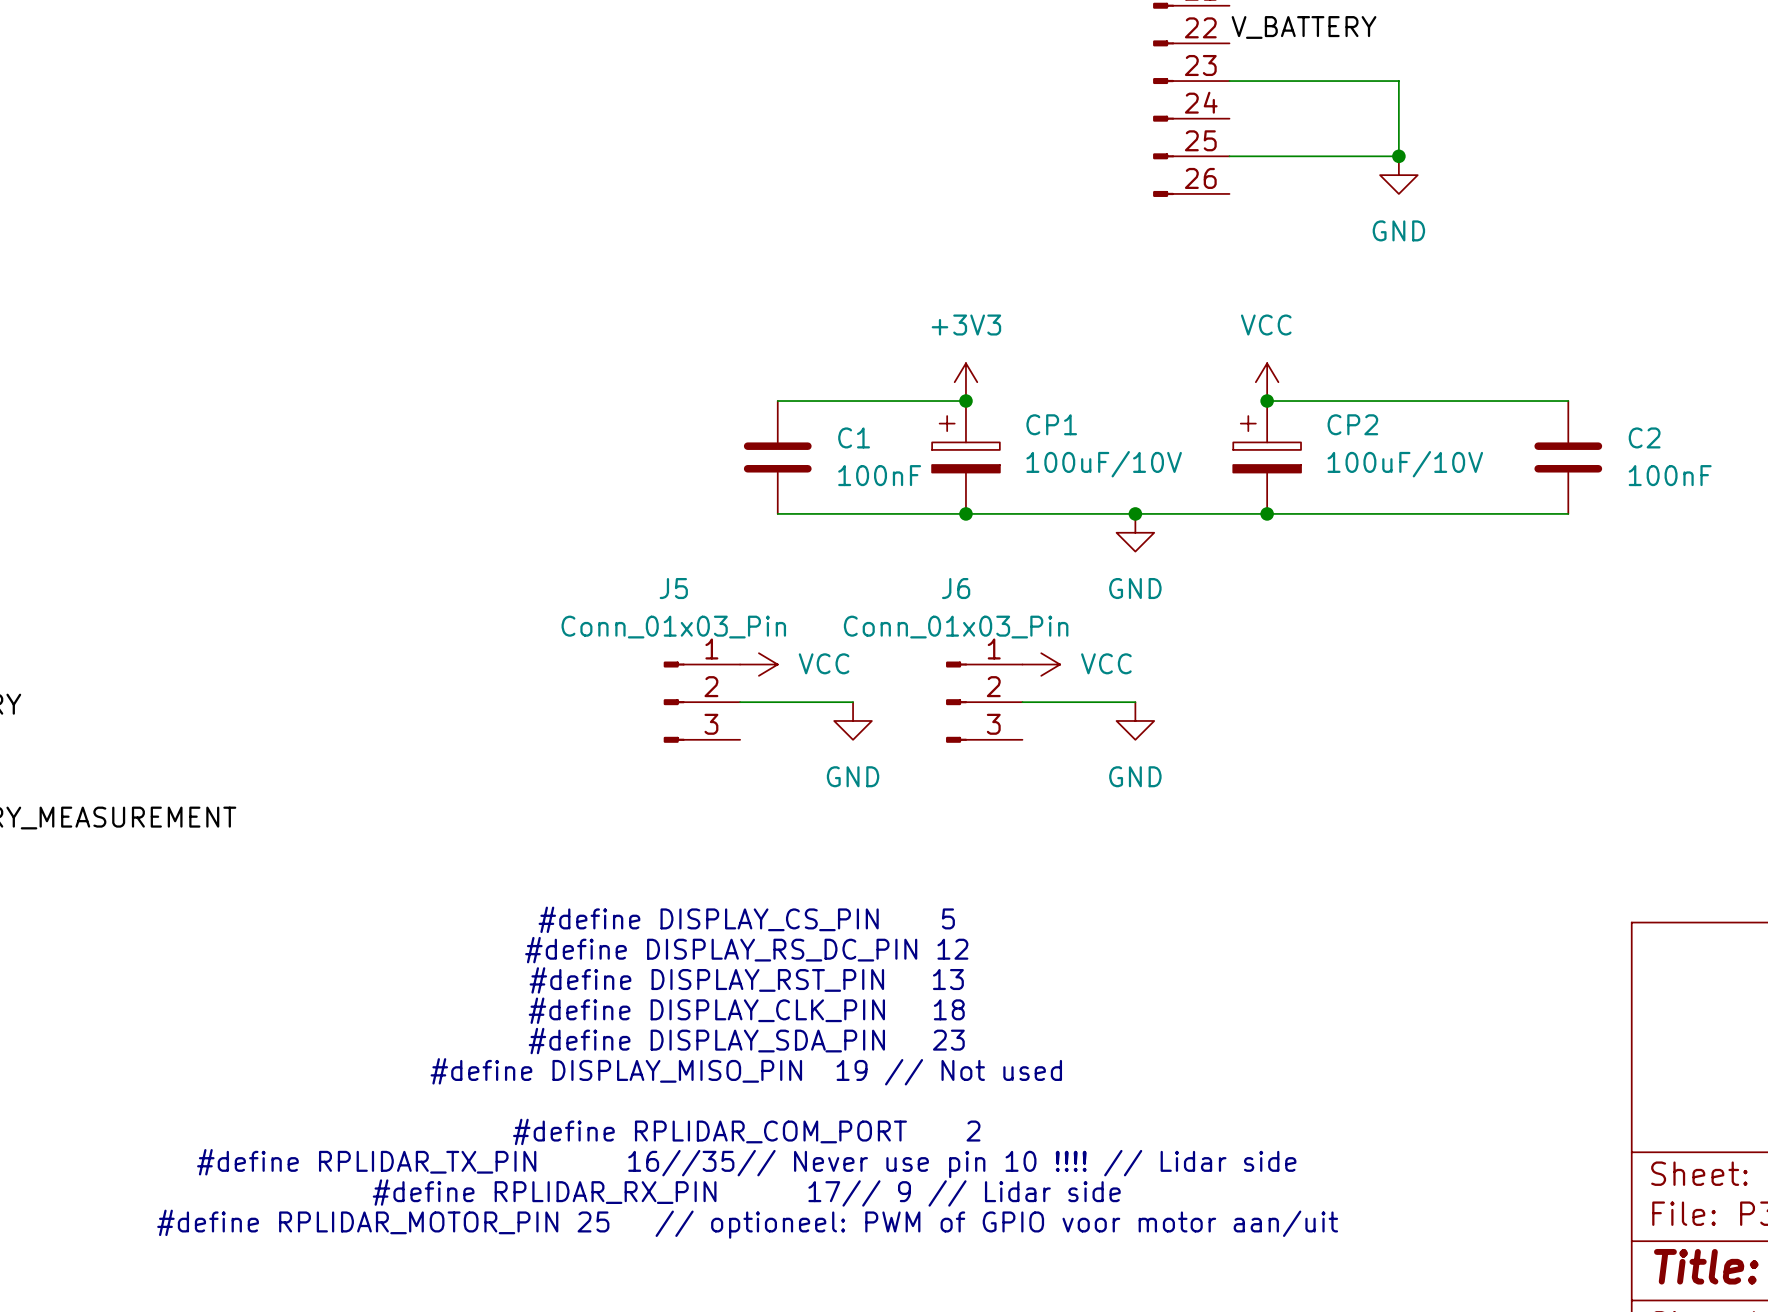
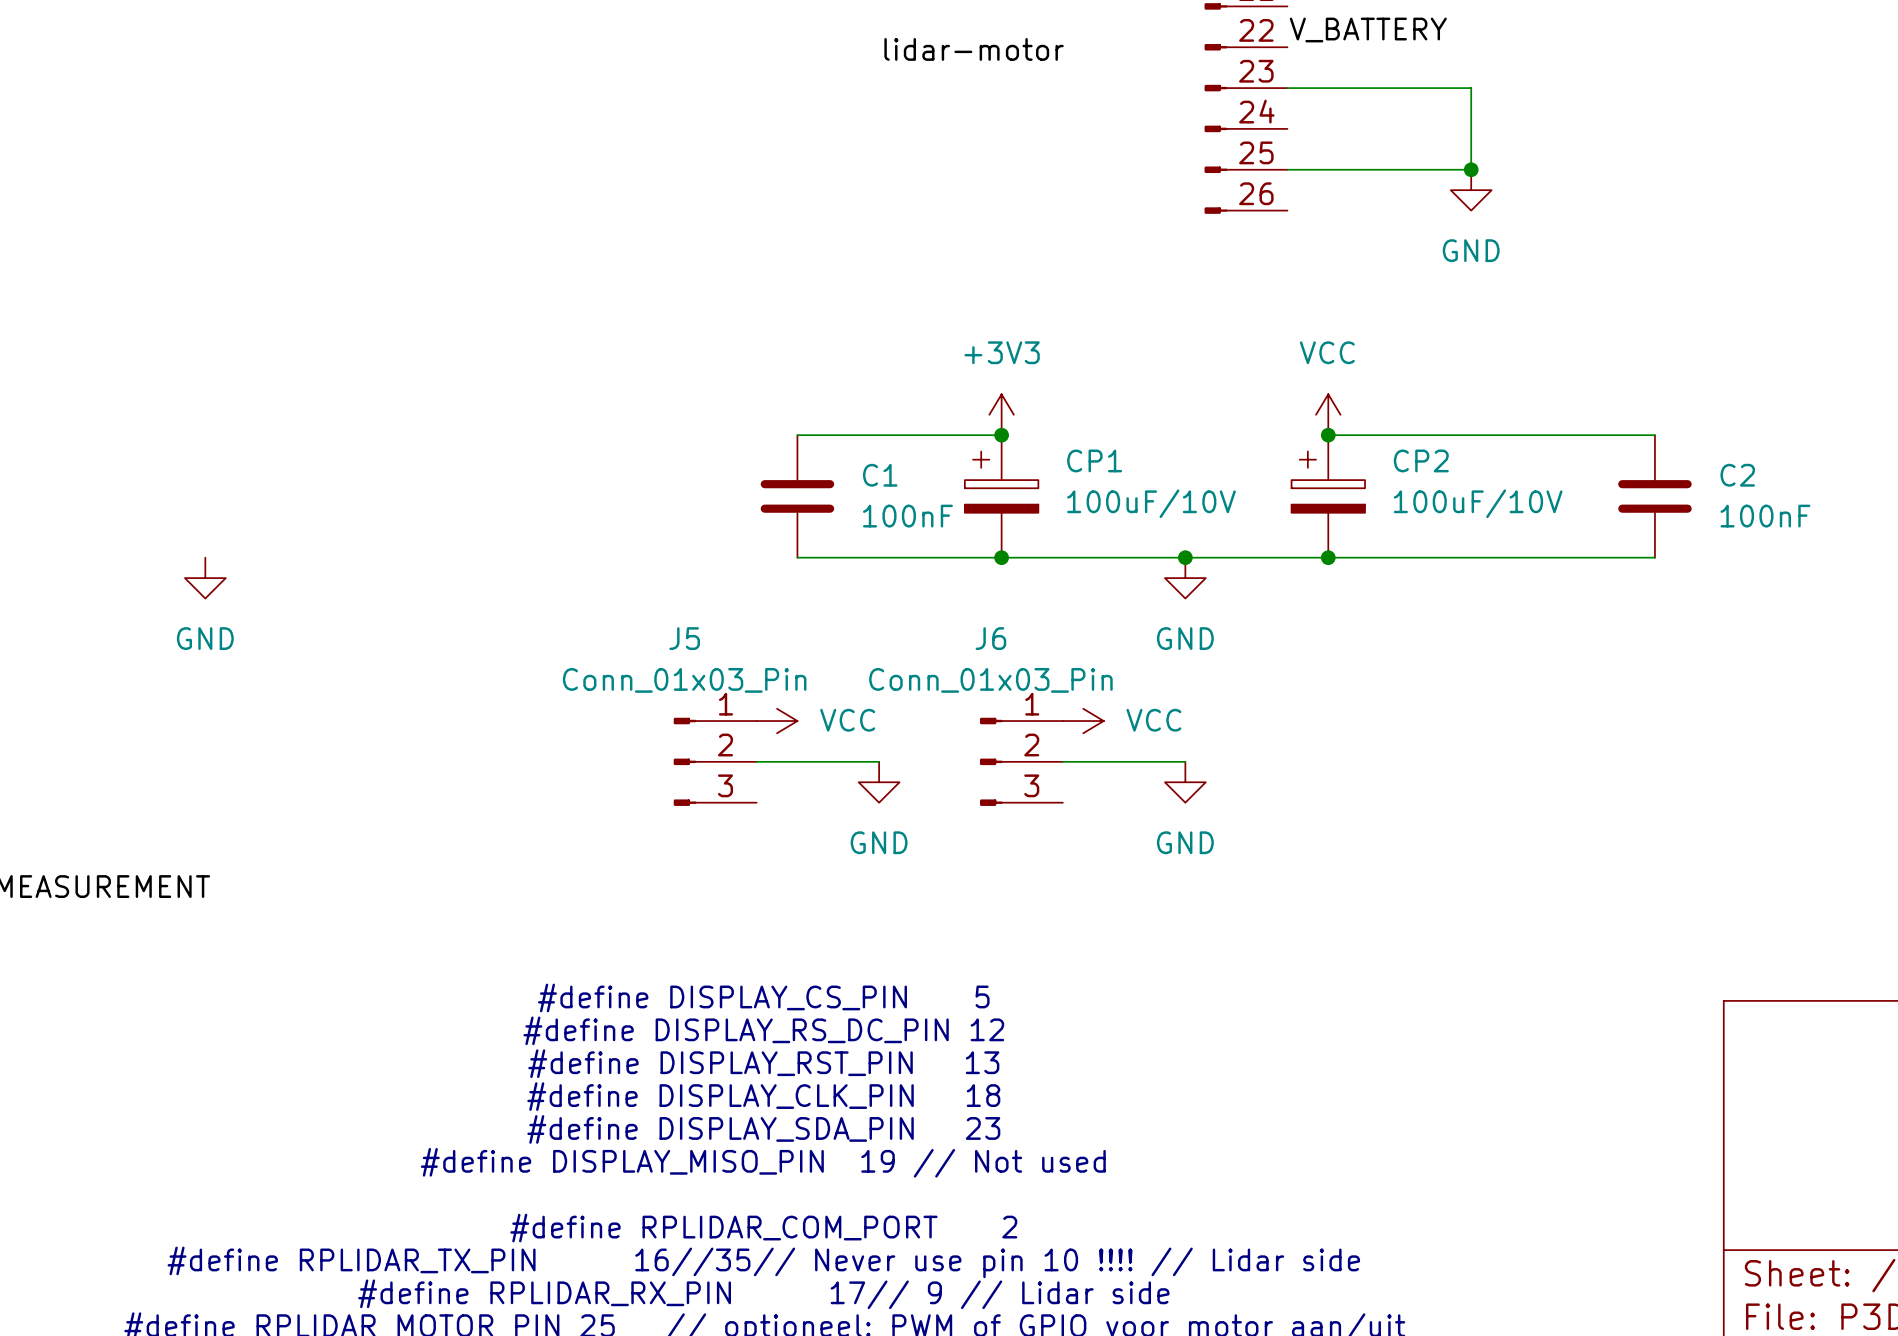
label: none -> lidar-motor (974, 49)
power symbol: none -> GND (205, 578)

